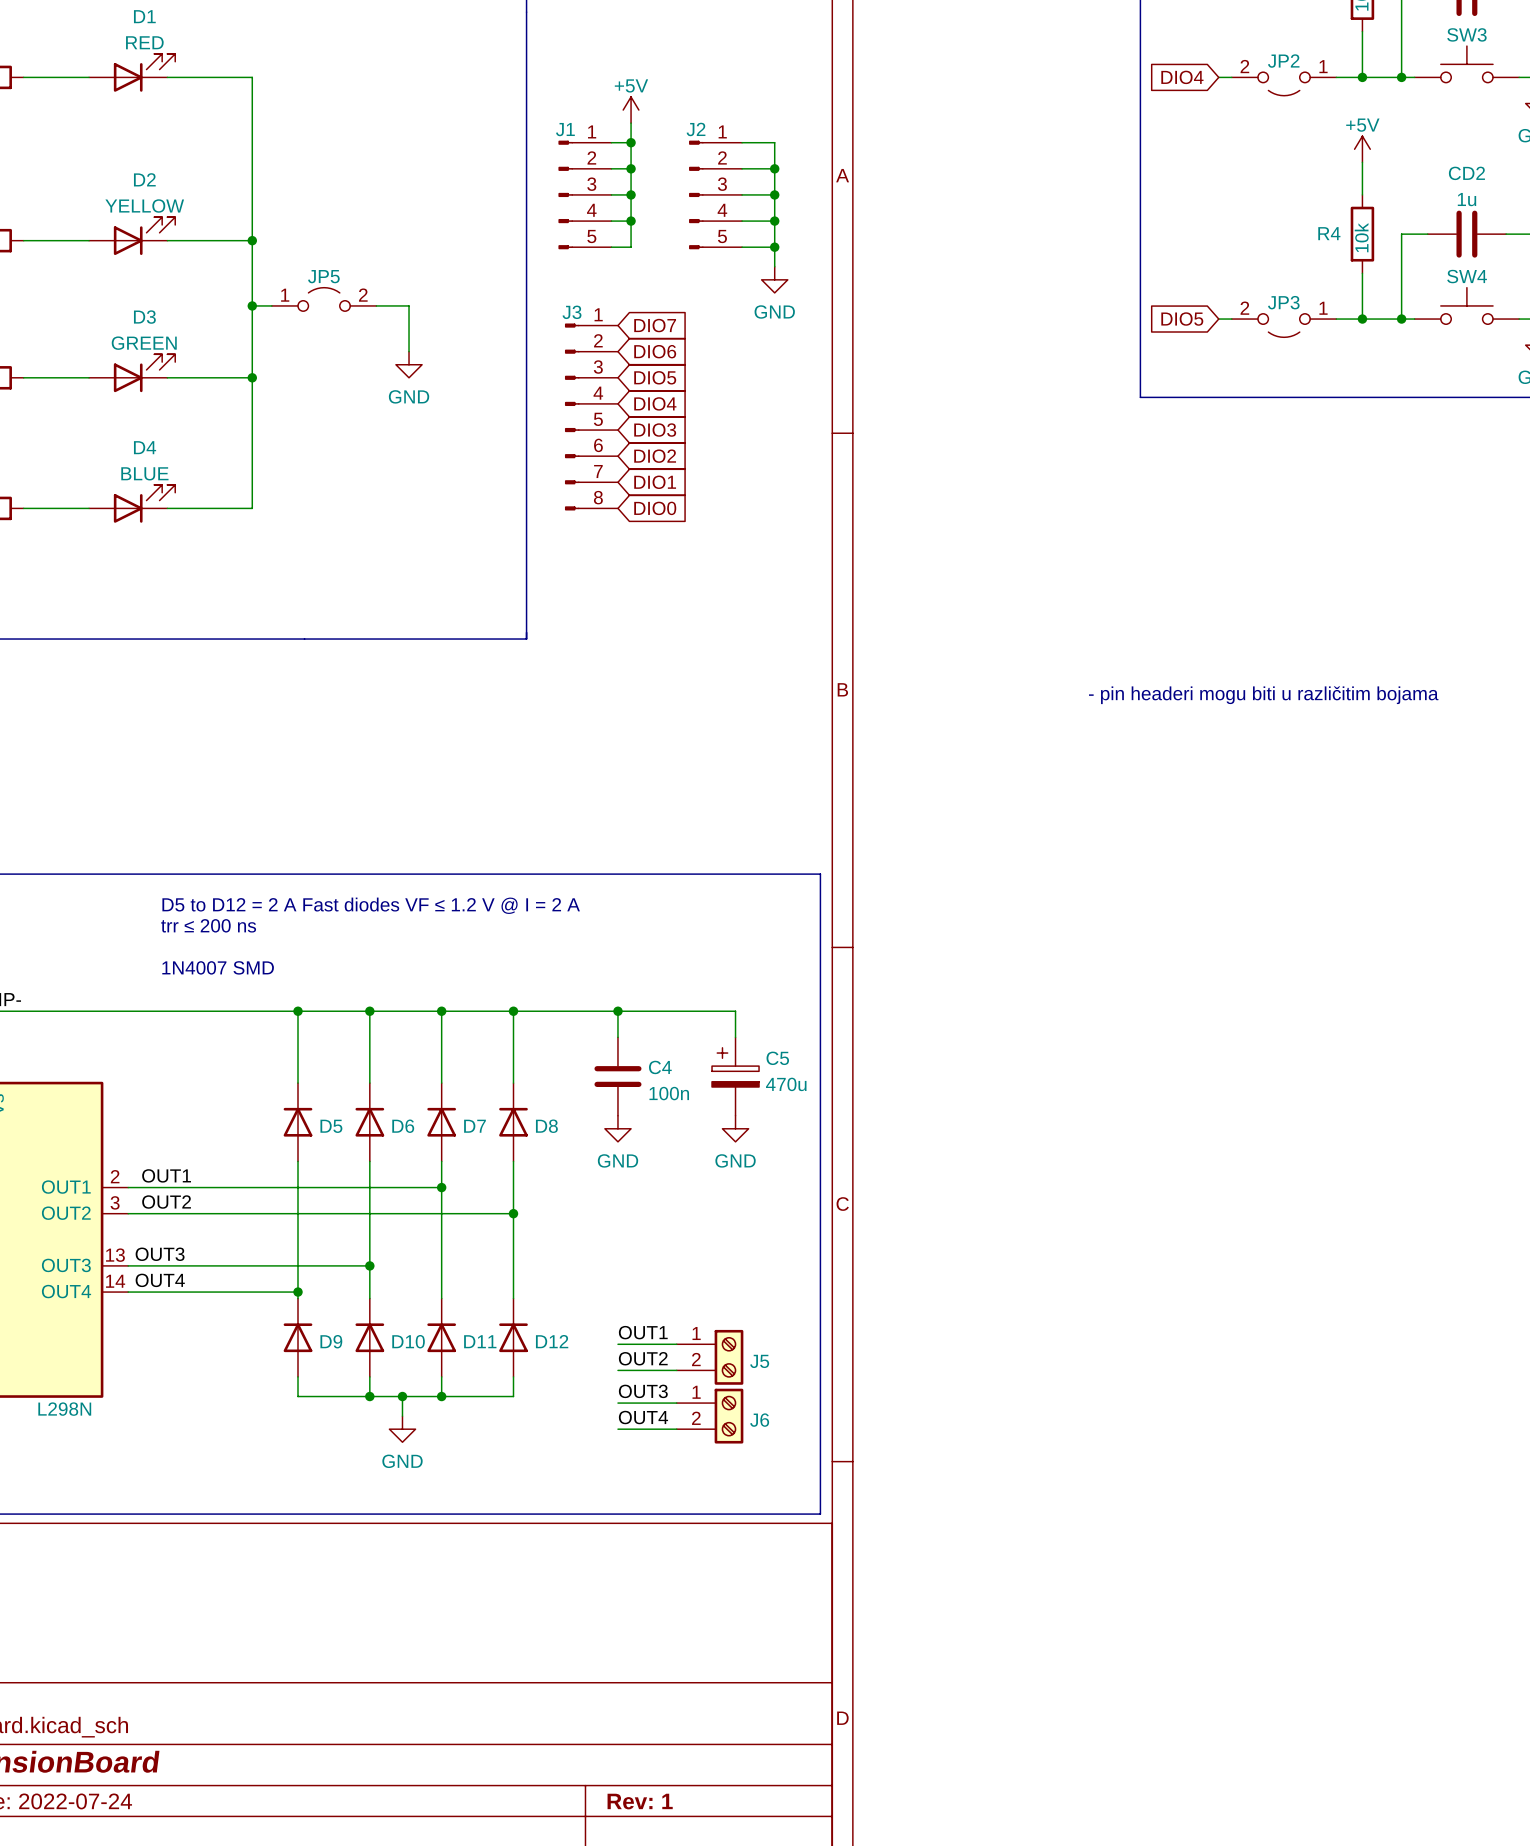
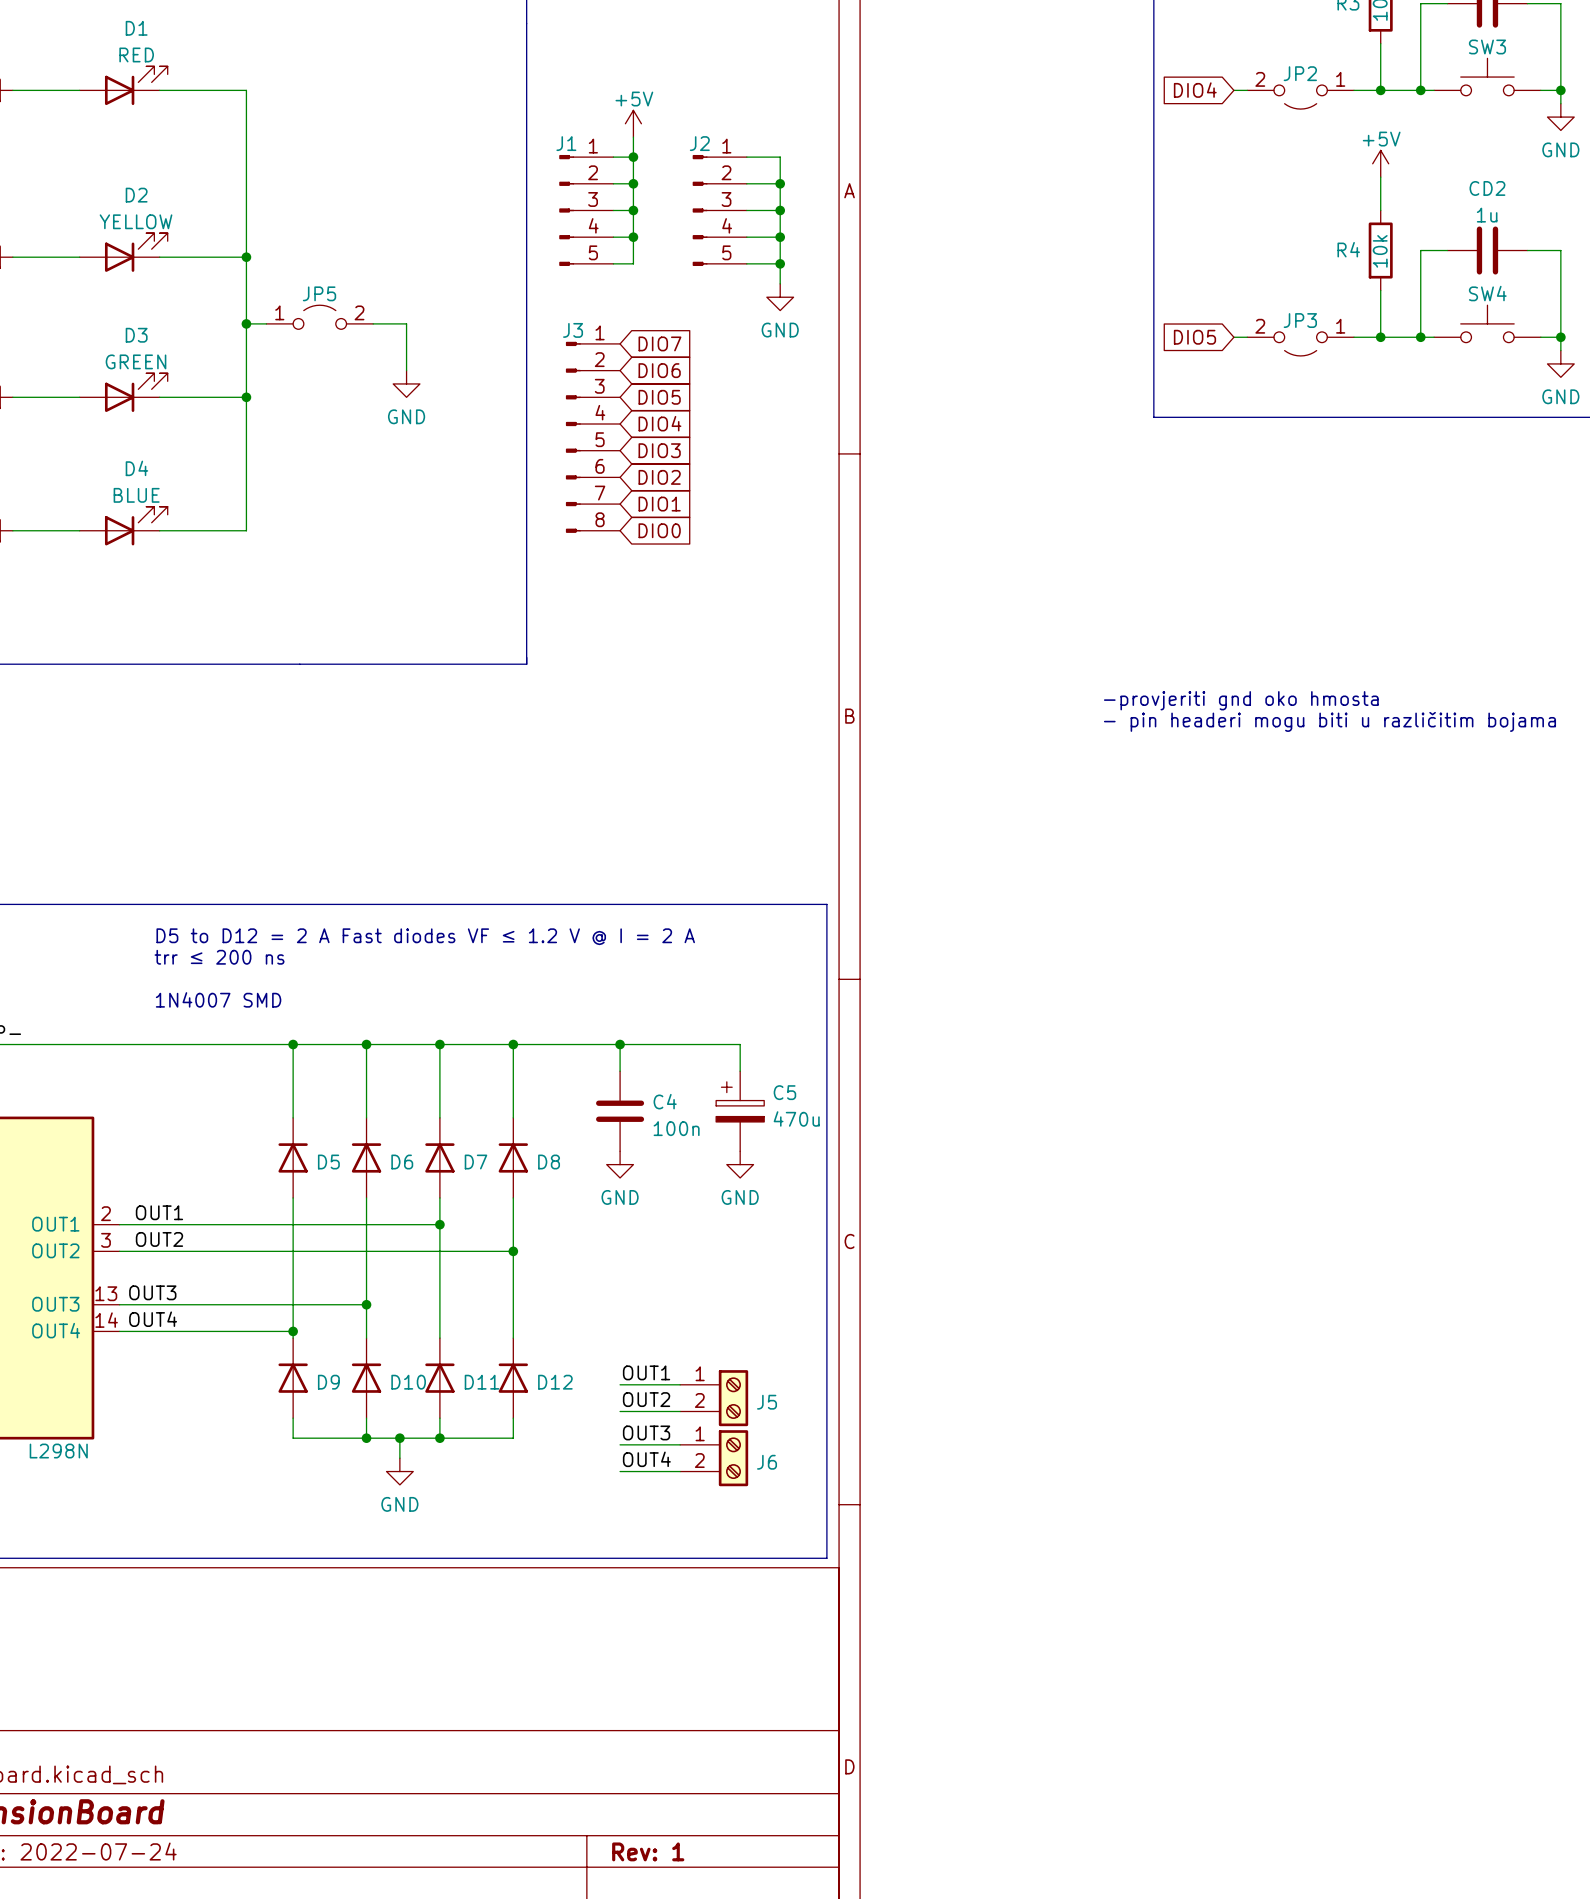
text: none -> -provjeriti gnd oko hmosta (1241, 700)

